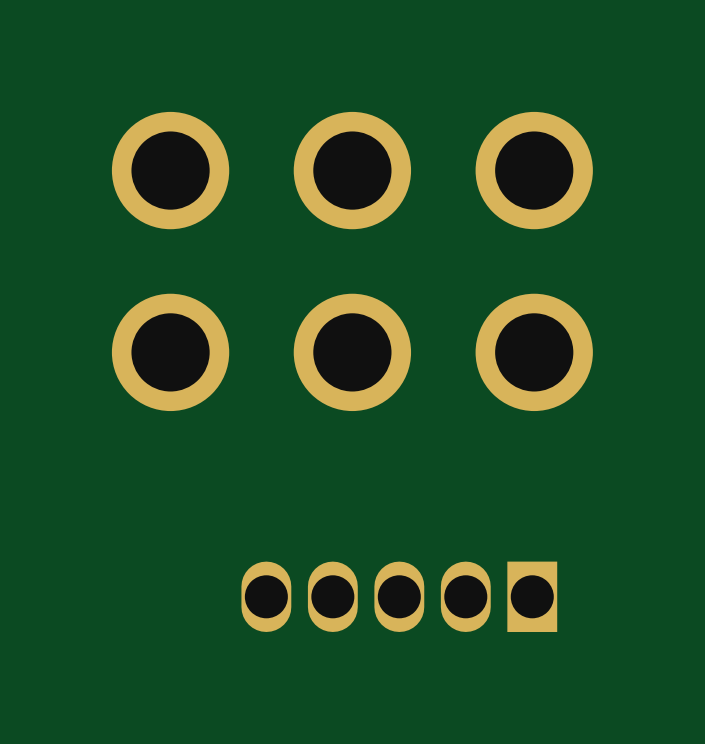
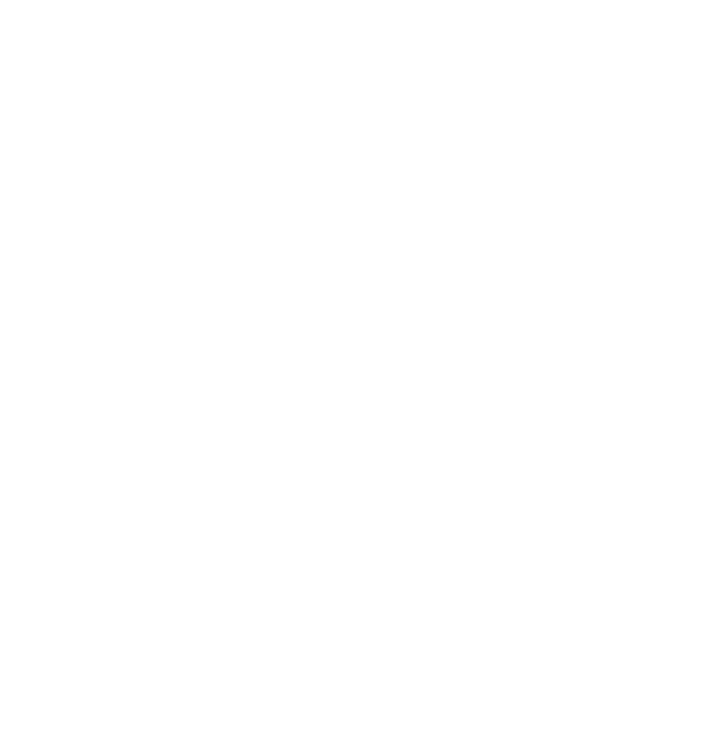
part: (170, 170) -> none
part: (352, 170) -> none
part: (534, 170) -> none
part: (170, 352) -> none
part: (352, 352) -> none
part: (534, 352) -> none
part: (399, 596) -> none

